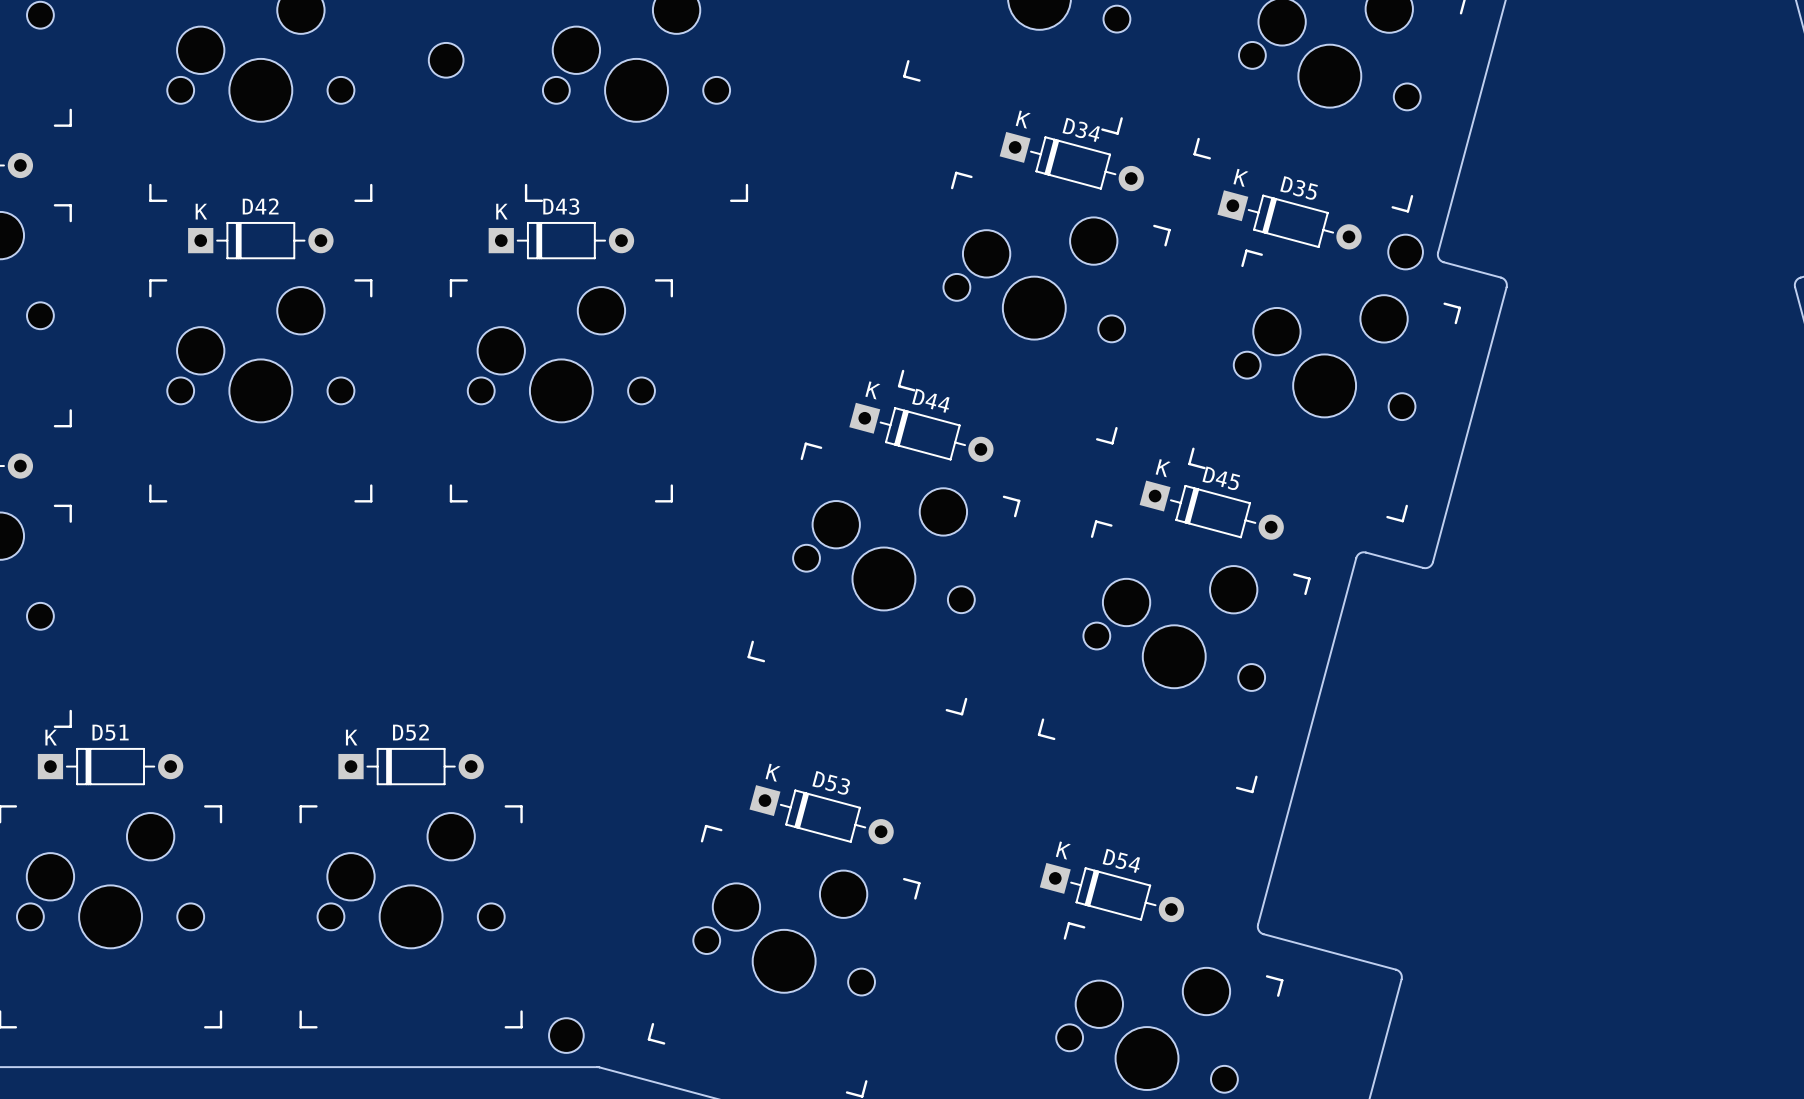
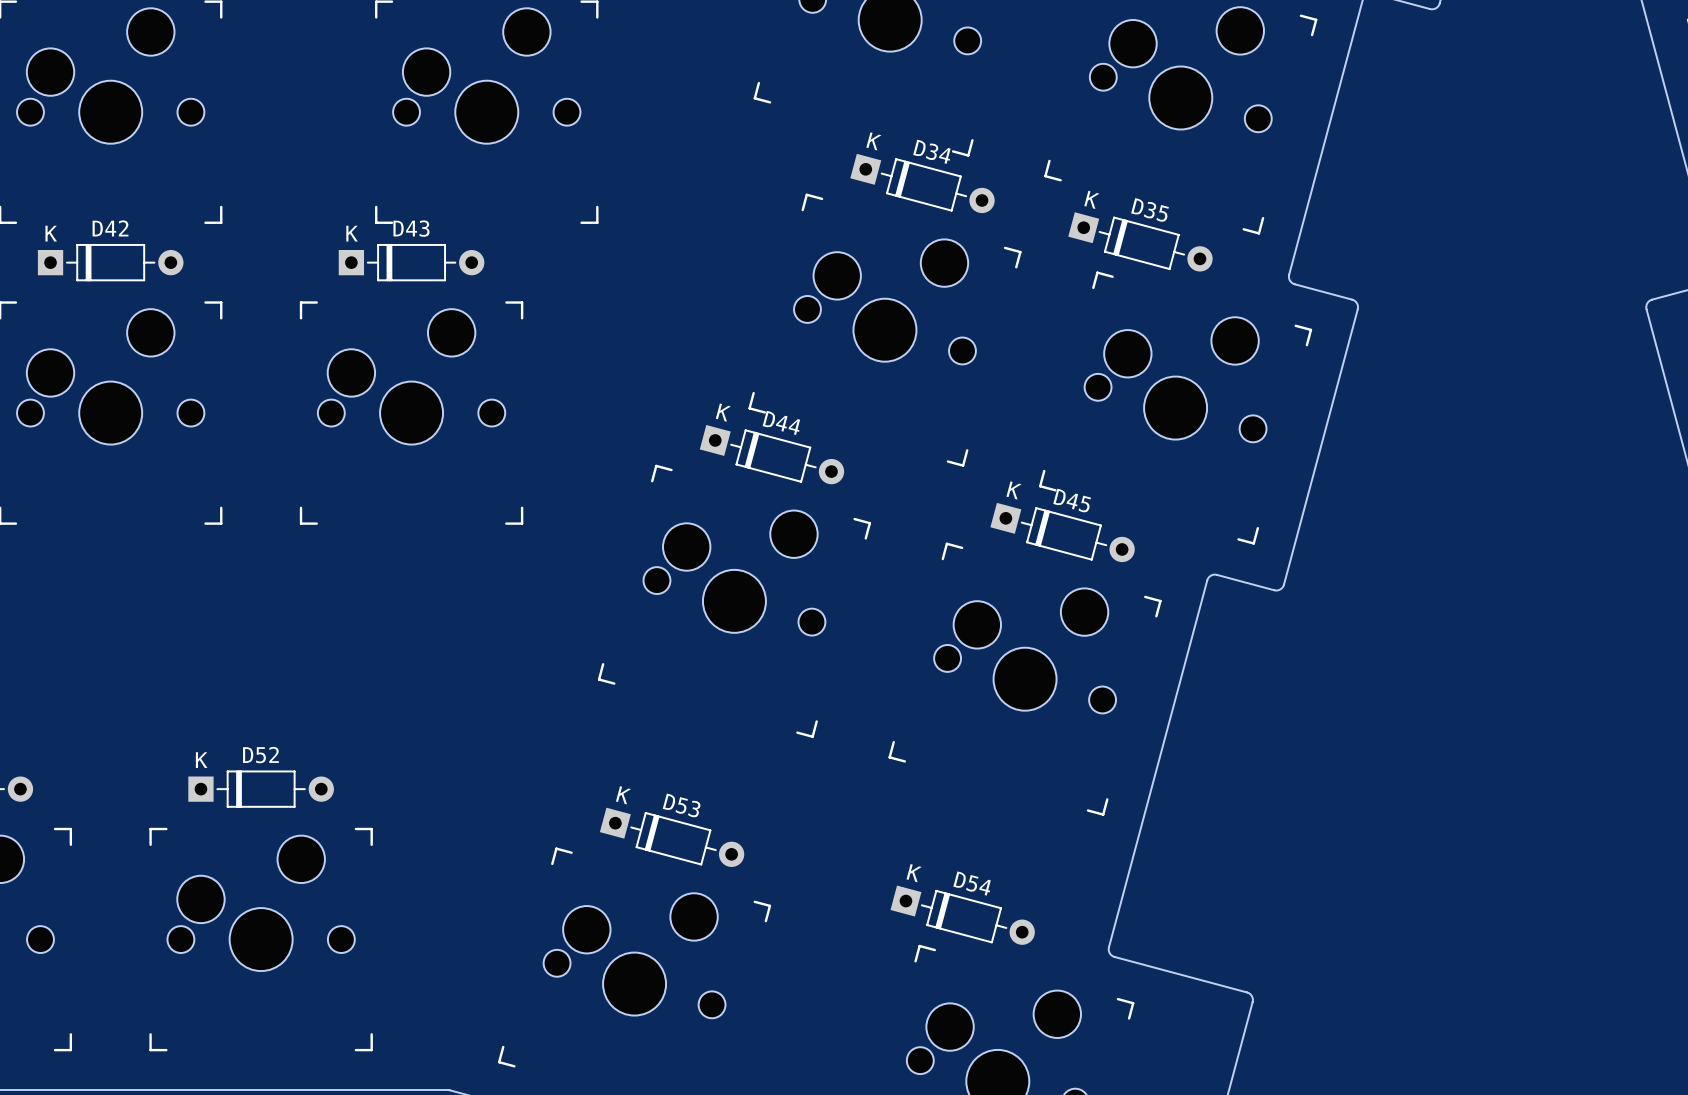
part: (446, 60) -> none
part: (1405, 252) -> none
part: (566, 1035) -> none

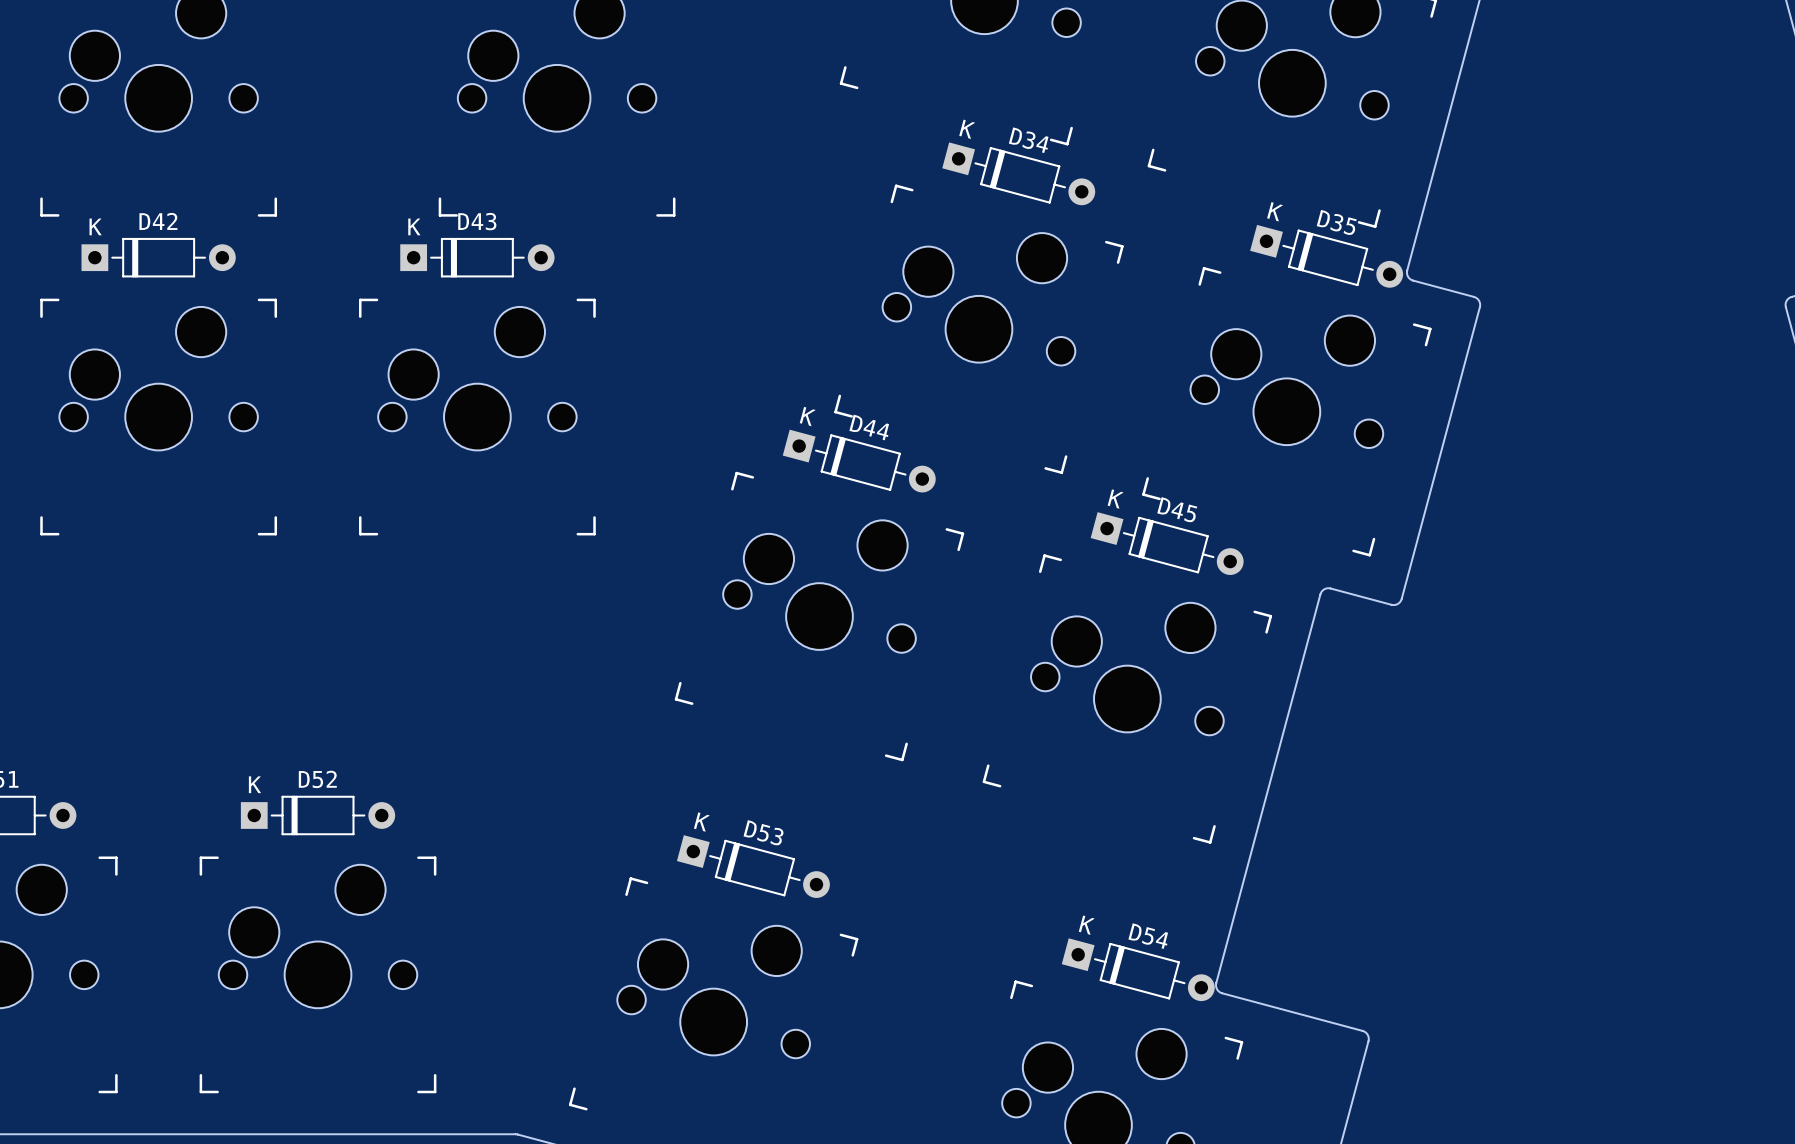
D35 position: (1140, 241) -> (1326, 256)
D54 position: (962, 915) -> (1138, 969)

